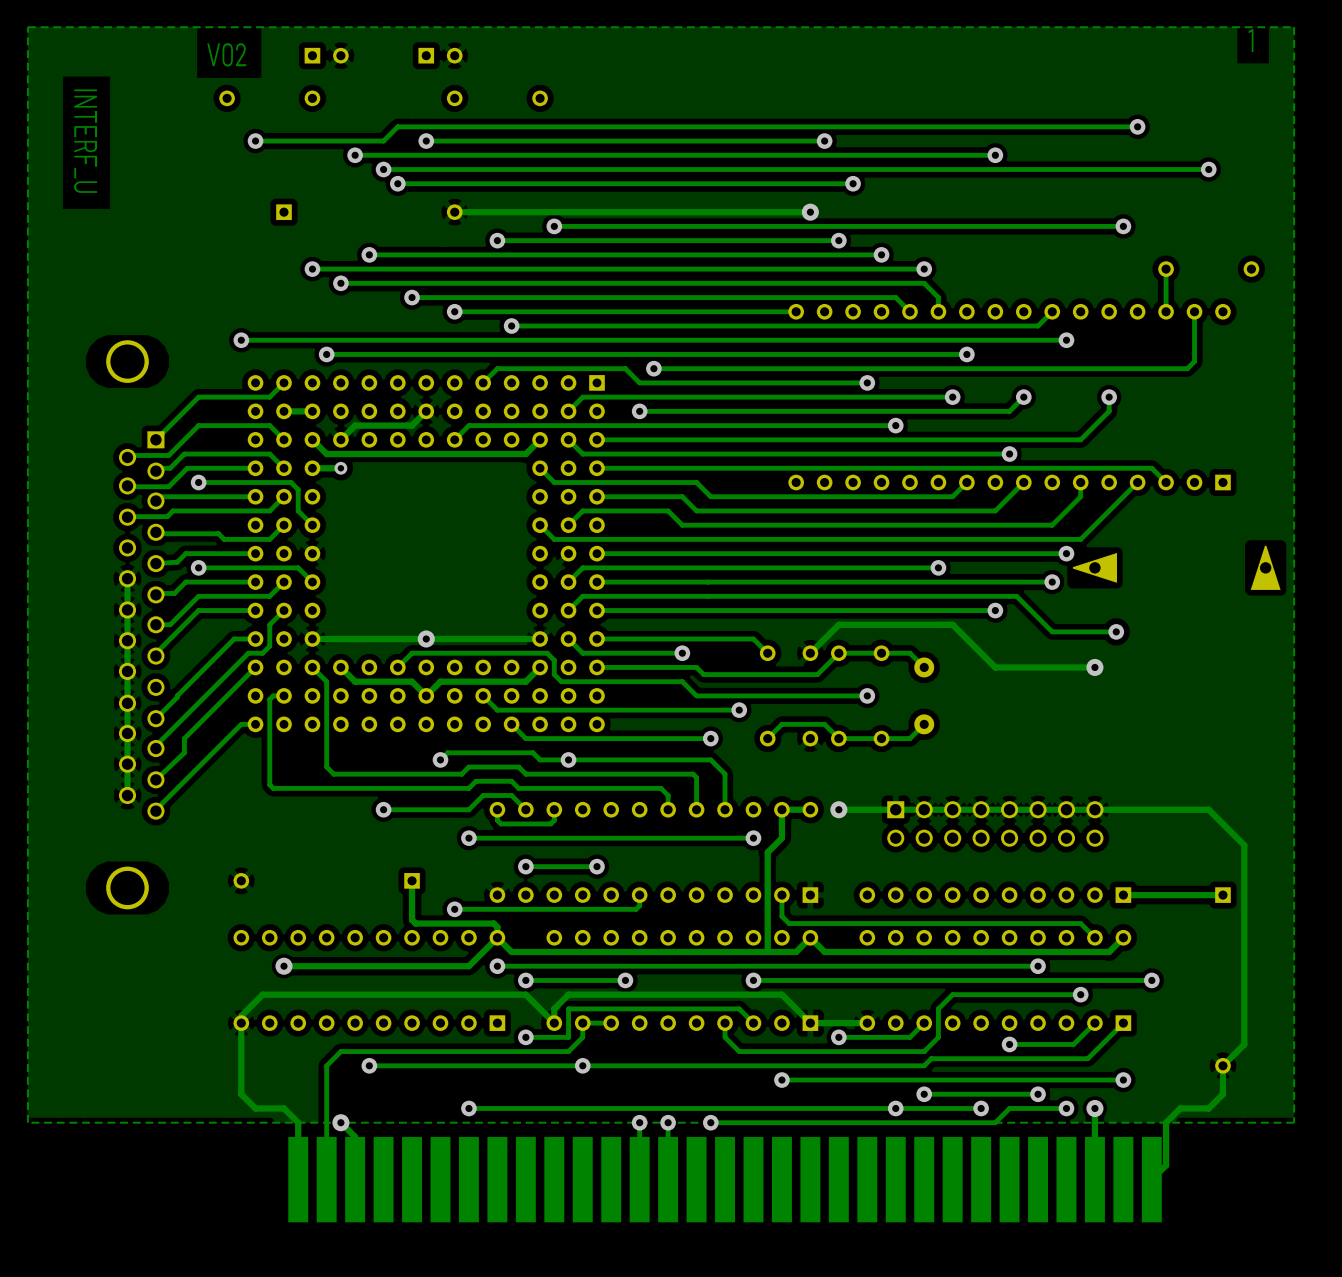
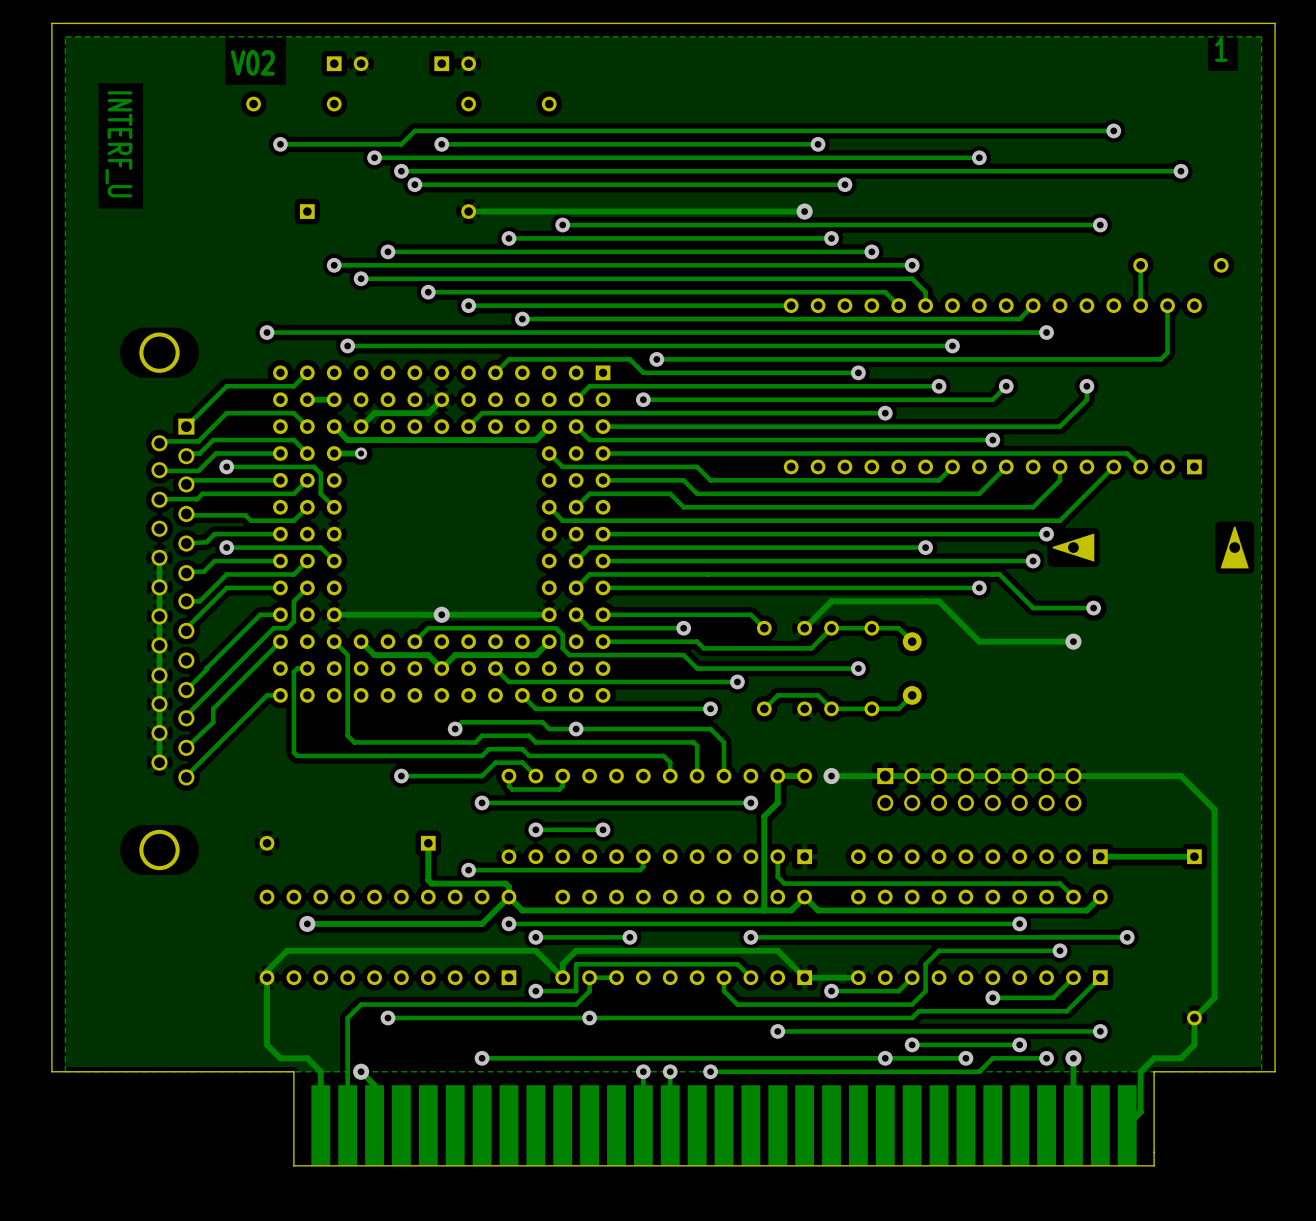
board edge: none -> (1275, 23) (1275, 1071) (1154, 1071) (1154, 1165) (293, 1165) (293, 1071) (51, 1071) (51, 23) (1275, 23)

